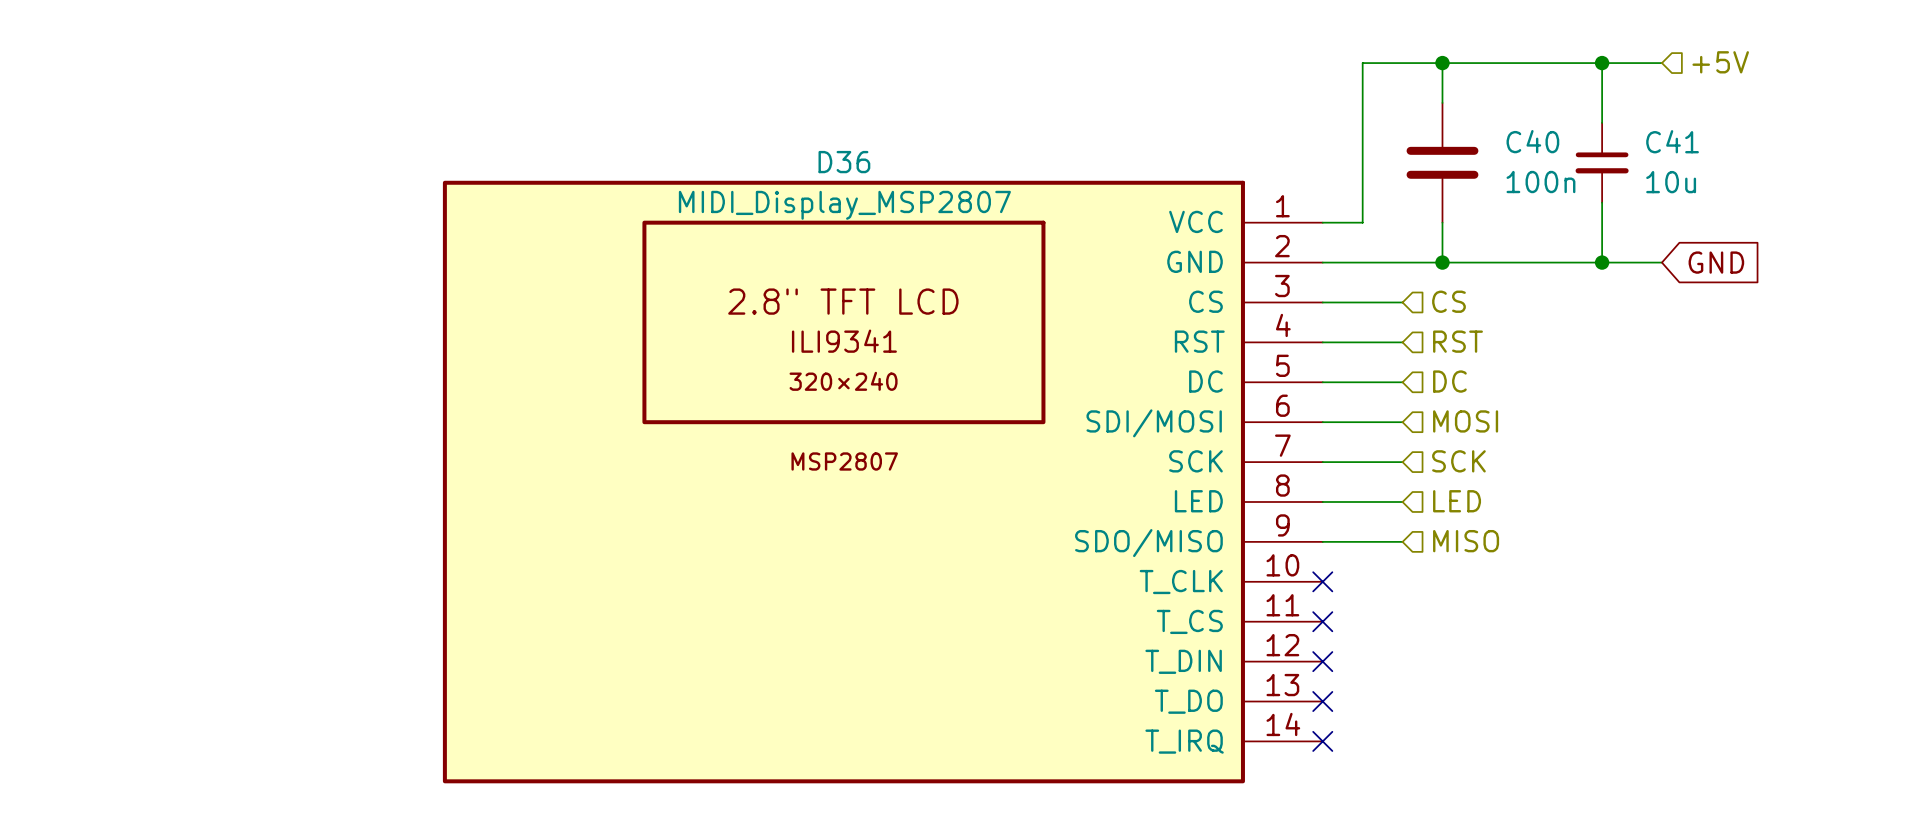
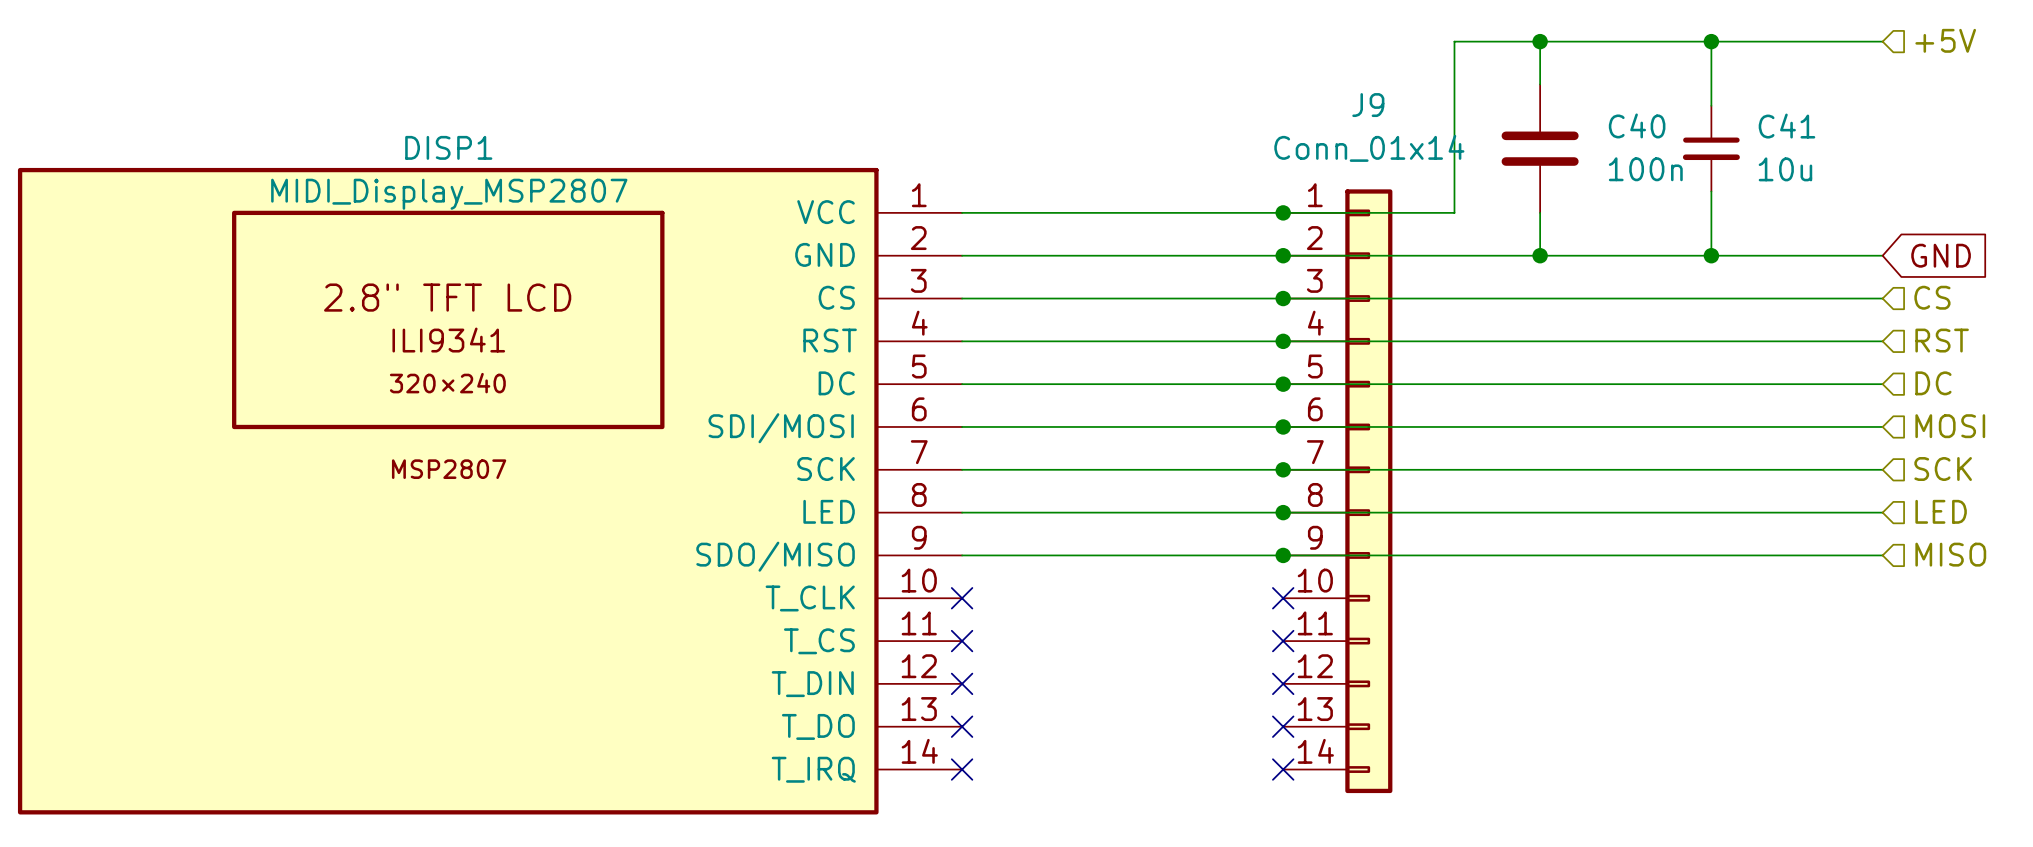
hierarchical label position: +5V (1720, 62) -> +5V (1945, 40)
wire: none -> (1775, 41) (1882, 41)
junction: none -> (1283, 212)
junction: none -> (1283, 255)
wire: none -> (1775, 255) (1882, 255)
global label position: GND (1716, 262) -> GND (1941, 255)
hierarchical label position: CS (1448, 301) -> CS (1932, 297)
junction: none -> (1283, 298)
wire: none -> (1497, 298) (1882, 298)
hierarchical label position: RST (1457, 341) -> RST (1942, 340)
junction: none -> (1283, 341)
wire: none -> (1497, 341) (1882, 341)
hierarchical label position: DC (1449, 381) -> DC (1933, 383)
junction: none -> (1283, 384)
wire: none -> (1497, 384) (1882, 384)
hierarchical label position: MOSI (1465, 421) -> MOSI (1950, 426)
junction: none -> (1283, 426)
wire: none -> (1497, 426) (1882, 426)
hierarchical label position: SCK (1458, 461) -> SCK (1943, 469)
junction: none -> (1283, 469)
wire: none -> (1497, 469) (1882, 469)
DISP1: none -> MIDI_Display_MSP2807 (490, 491)
D36: MIDI_Display_MSP2807 (882, 482) -> none
J9: none -> Conn_01x14 (1337, 491)
junction: none -> (1283, 512)
wire: none -> (1497, 512) (1882, 512)
hierarchical label position: LED (1457, 501) -> LED (1941, 511)
junction: none -> (1283, 555)
wire: none -> (1497, 555) (1882, 555)
hierarchical label position: MISO (1466, 541) -> MISO (1950, 554)
no-connect mark: none -> (962, 598)
no-connect mark: none -> (1283, 598)
no-connect mark: (1322, 581) -> none
no-connect mark: none -> (962, 641)
no-connect mark: none -> (1283, 641)
no-connect mark: (1322, 621) -> none
no-connect mark: none -> (962, 683)
no-connect mark: none -> (1283, 683)
no-connect mark: (1322, 661) -> none
no-connect mark: none -> (962, 726)
no-connect mark: none -> (1283, 726)
no-connect mark: (1322, 701) -> none
no-connect mark: none -> (962, 769)
no-connect mark: none -> (1283, 769)
no-connect mark: (1322, 741) -> none

